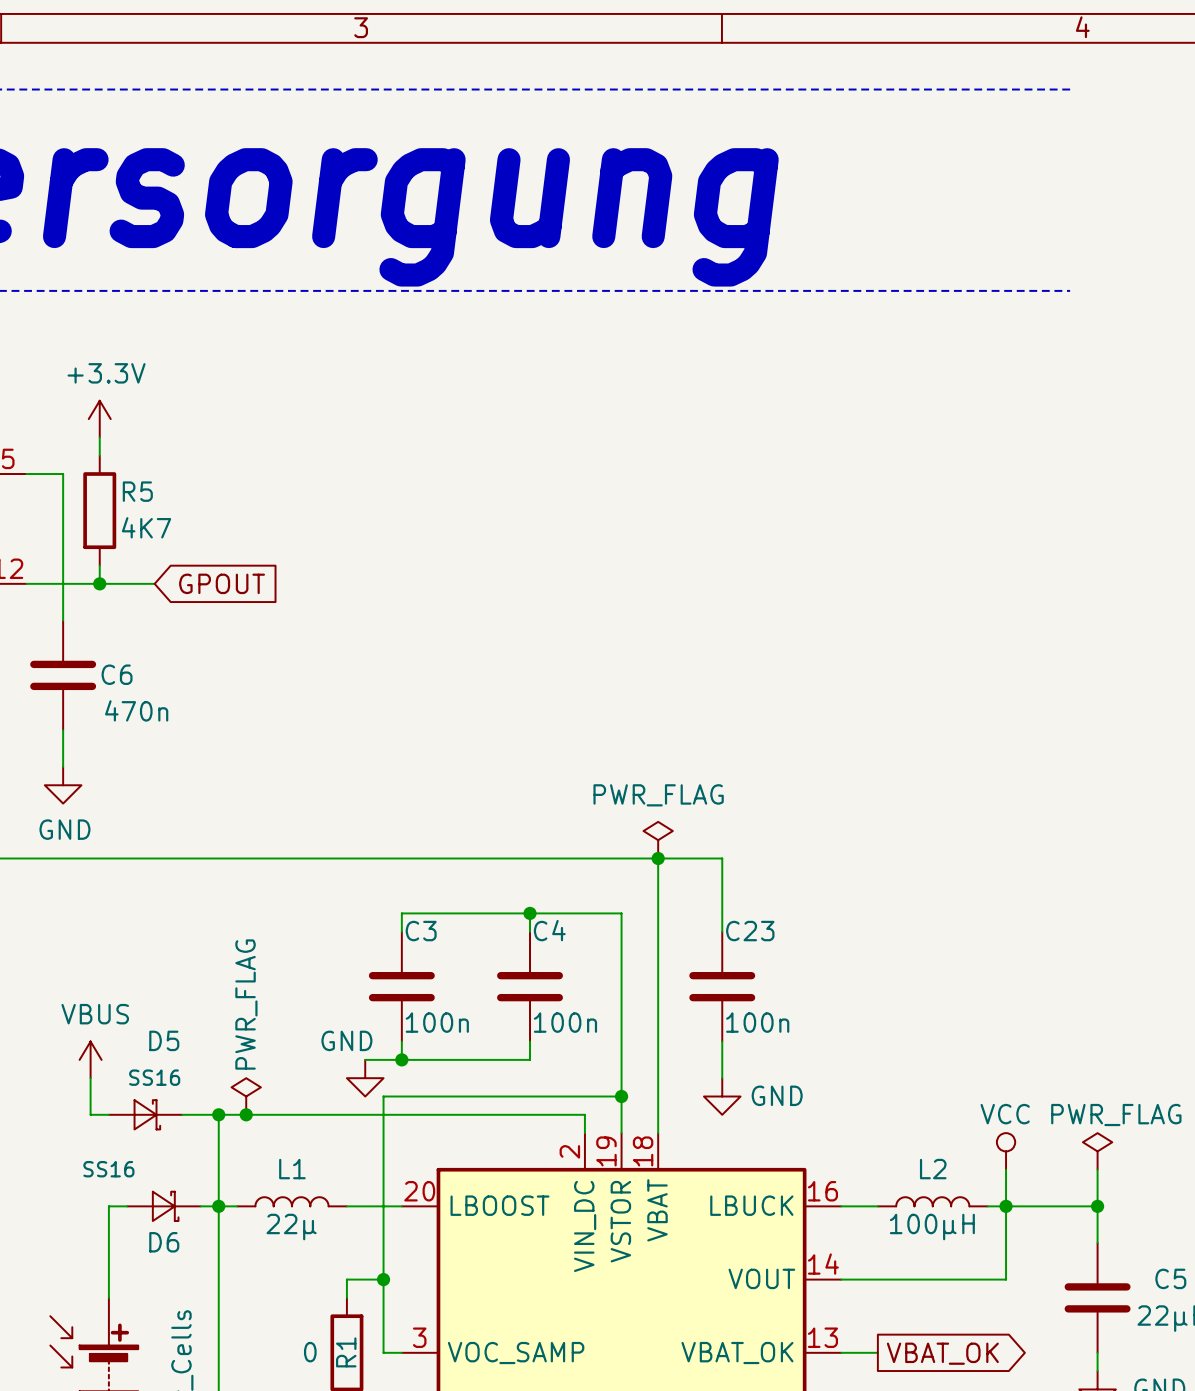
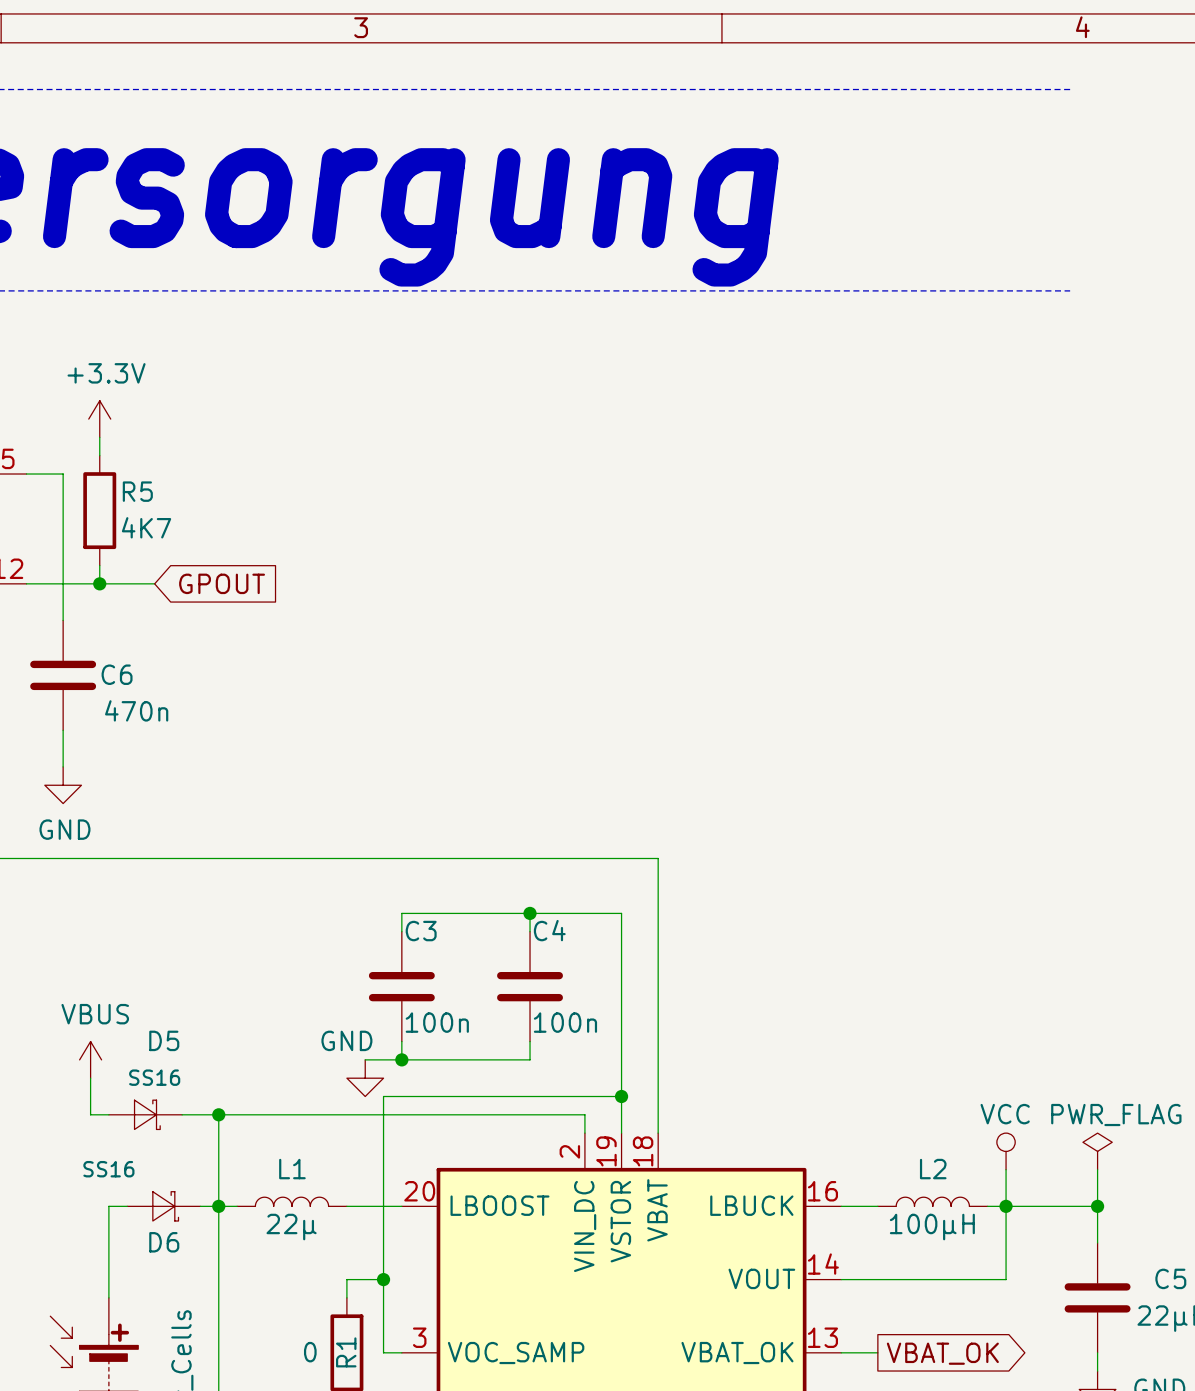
power symbol: PWR_FLAG (658, 840) -> none
wire: (658, 858) (722, 858) (722, 931) -> none
junction: (658, 858) -> none
C23: 100n (722, 986) -> none
wire: (722, 1041) (722, 1078) -> none
power symbol: PWR_FLAG (246, 1096) -> none
power symbol: GND (722, 1096) -> none
junction: (246, 1114) -> none

